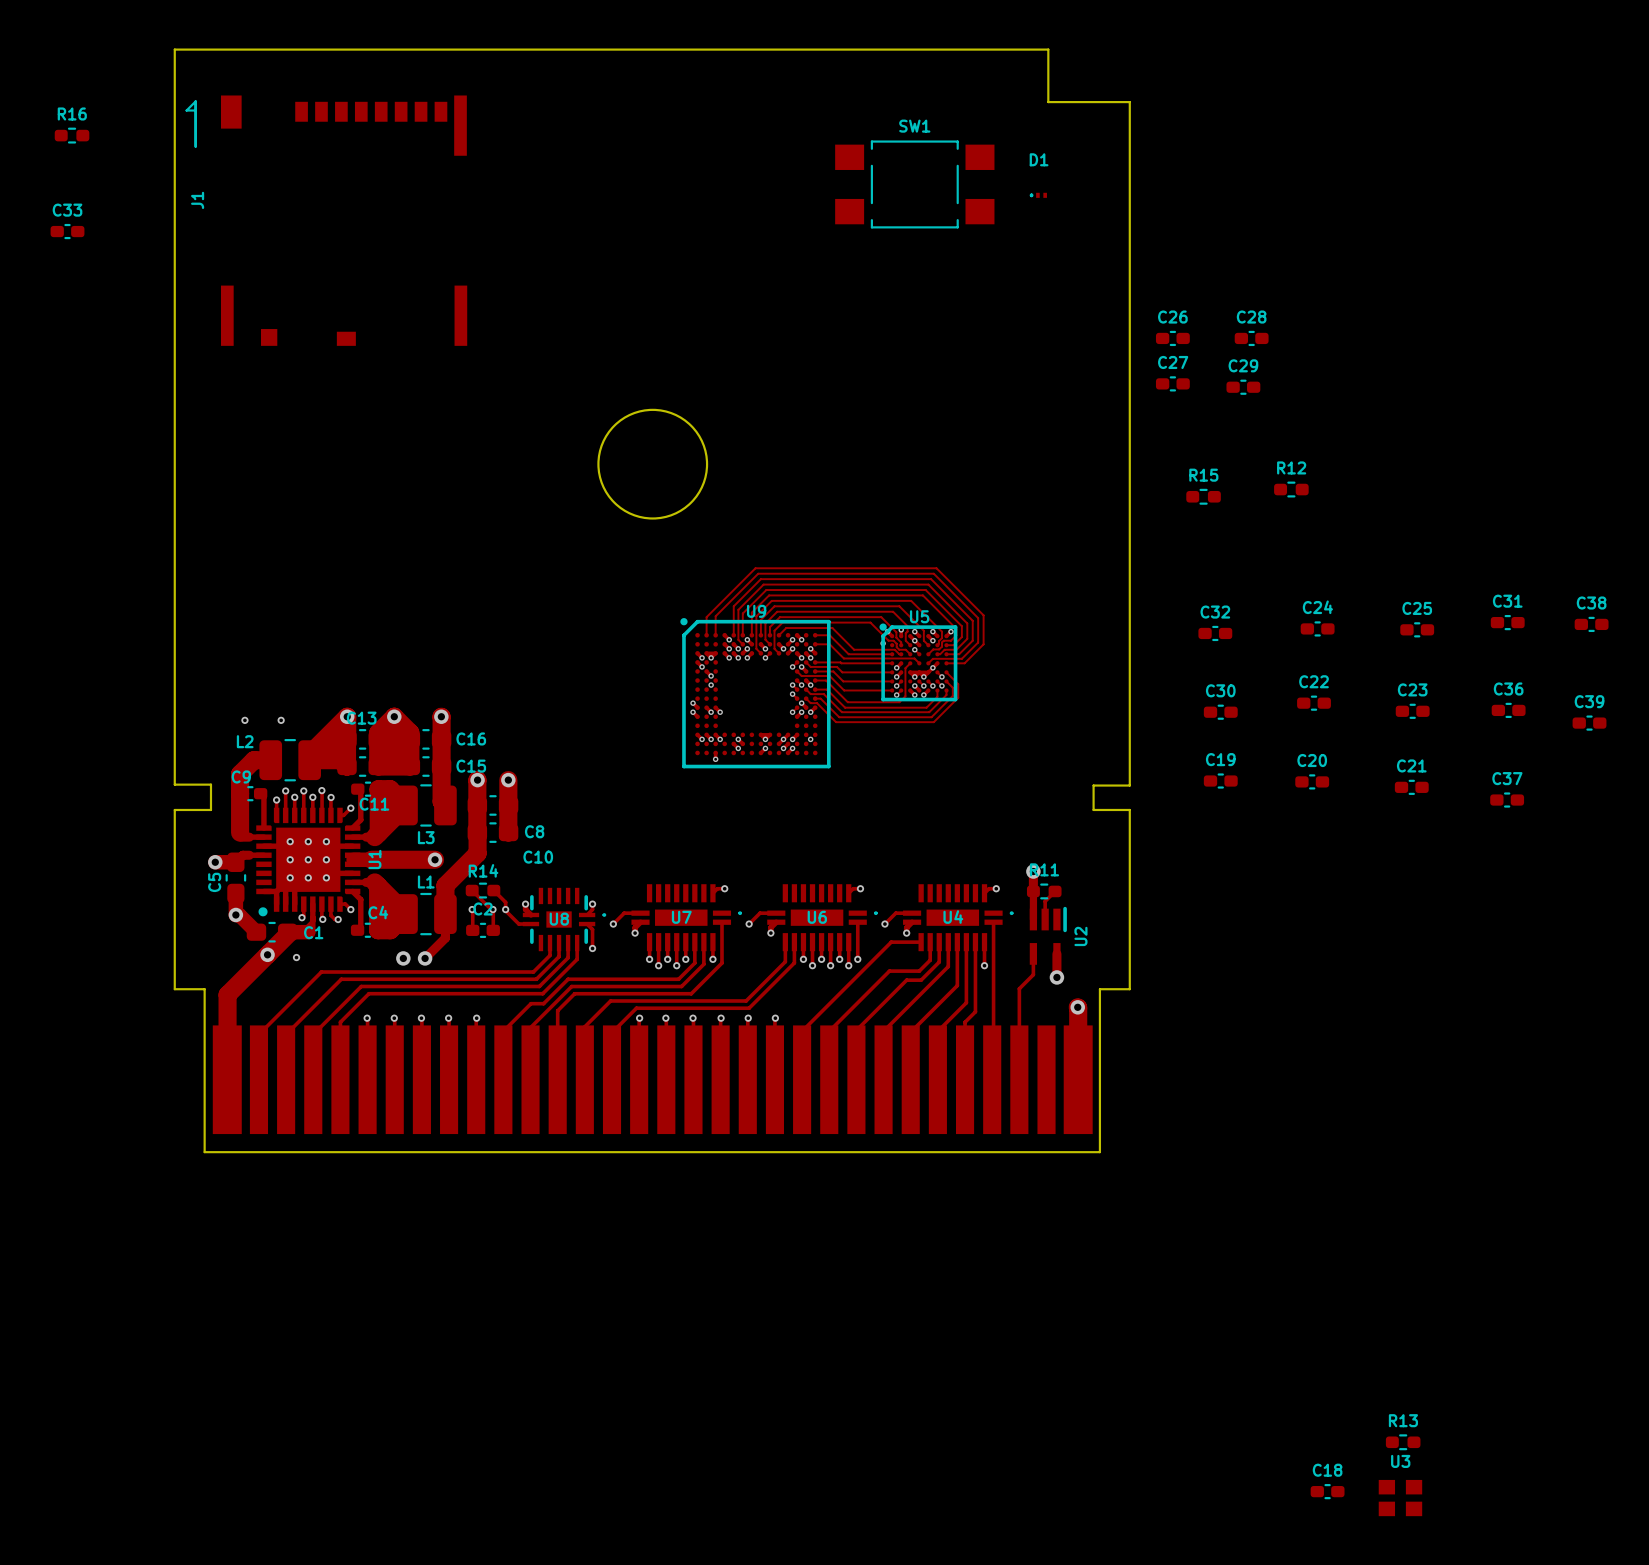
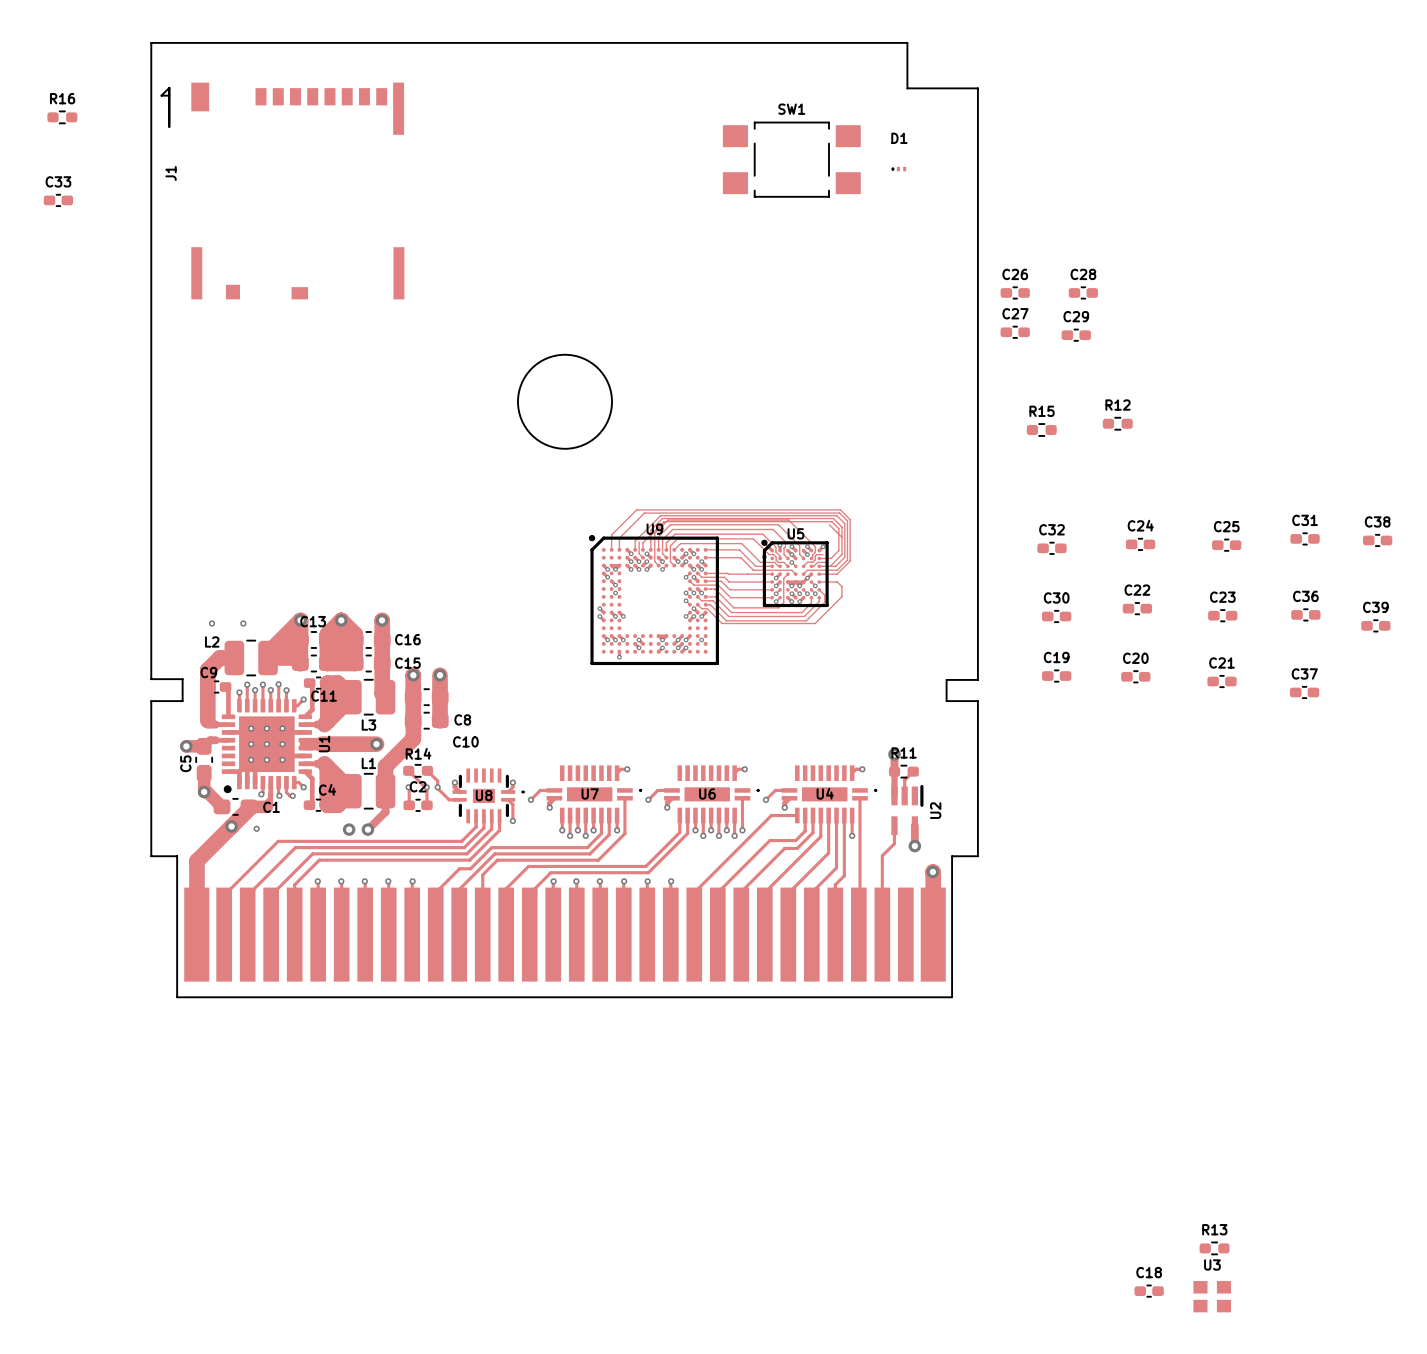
track: (765, 599) (769, 595) (922, 595) (956, 628) (956, 635) (951, 640) -> (662, 518) (833, 518) (841, 527) (841, 537)
track: (958, 606) (931, 579) (760, 579) (733, 606) (733, 625) -> (830, 566) (835, 566) (844, 557) (844, 523) (836, 515) (660, 515) (635, 541)
track: (706, 618) (755, 568) (936, 568) (983, 615) (983, 644) (964, 663) -> (611, 534) (636, 509) (840, 509) (850, 519) (850, 561) (834, 574)
track: (715, 621) (715, 616) (758, 573) (933, 573) (978, 618) (978, 642) (961, 658) -> (619, 538) (644, 513) (839, 513) (847, 520) (847, 560) (837, 570) (832, 570)
track: (738, 626) (738, 609) (763, 584) (928, 584) (967, 623) (967, 638) (956, 649) -> none
track: (742, 627) (742, 613) (766, 590) (925, 590) (961, 626) (961, 637) (953, 645) -> (642, 542) (664, 521) (831, 521) (838, 528) (838, 550) (831, 558) (825, 558)
track: (832, 628) (854, 649) (878, 649) -> (720, 543) (741, 543) (760, 562)
track: (829, 635) (848, 654) (873, 654) -> (718, 549) (739, 549) (755, 566)
track: (829, 644) (843, 658) (914, 658) -> (718, 557) (740, 557) (753, 570) (791, 570)
track: (946, 672) (958, 684) (958, 697) (933, 722) (836, 722) (834, 720) -> (819, 582) (837, 582) (841, 586) (841, 596) (815, 623) (722, 623)

